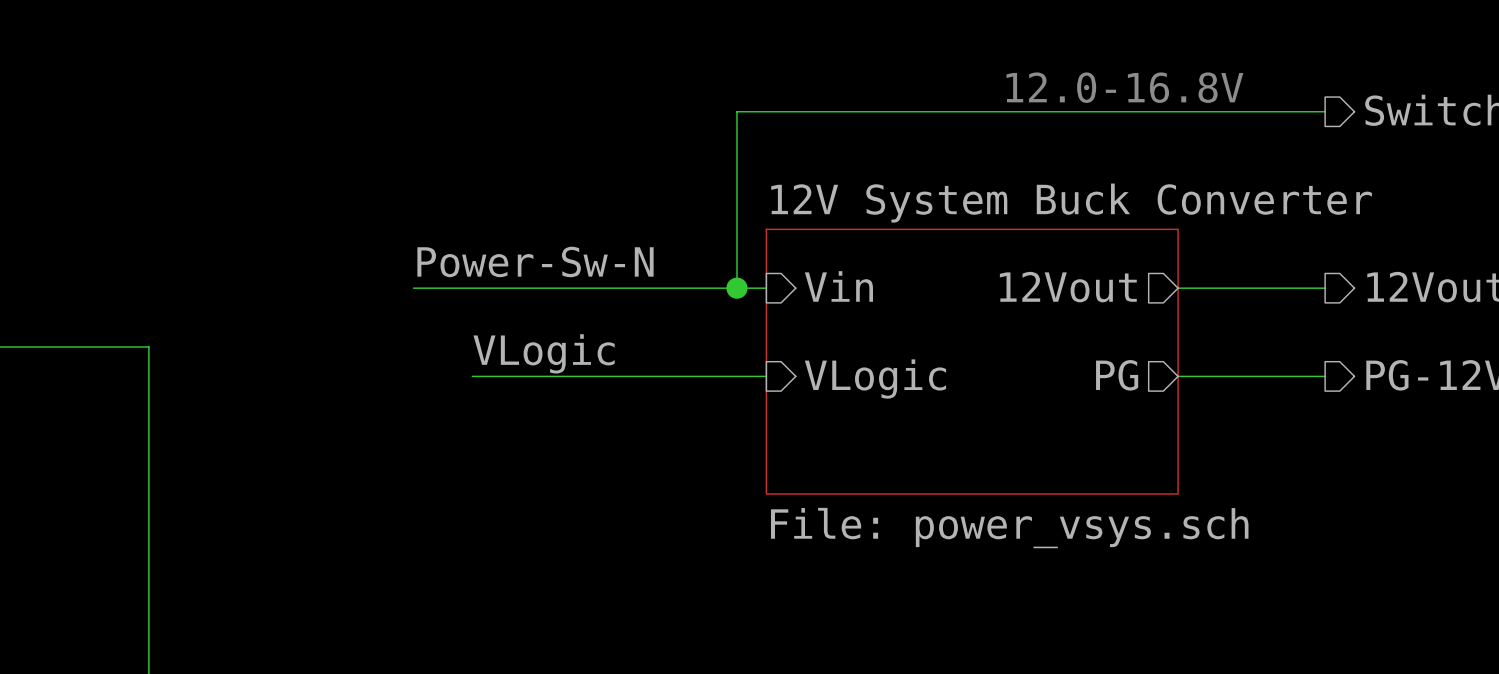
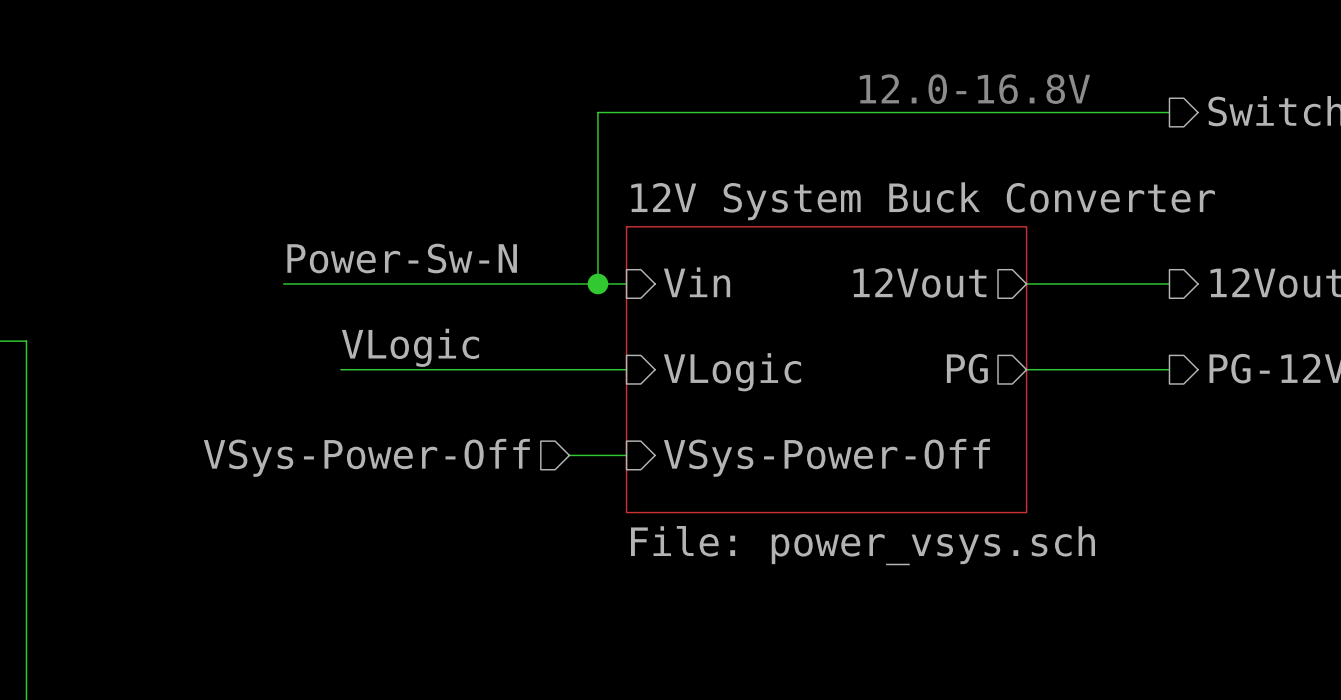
sheet 12V System Buck Converter shape: [766, 229, 1179, 495] -> [626, 226, 1027, 513]
wire: none -> (569, 455) (626, 455)
hierarchical label: none -> VSys-Power-Off (366, 457)
sheet pin: none -> VSys-Power-Off (826, 457)

